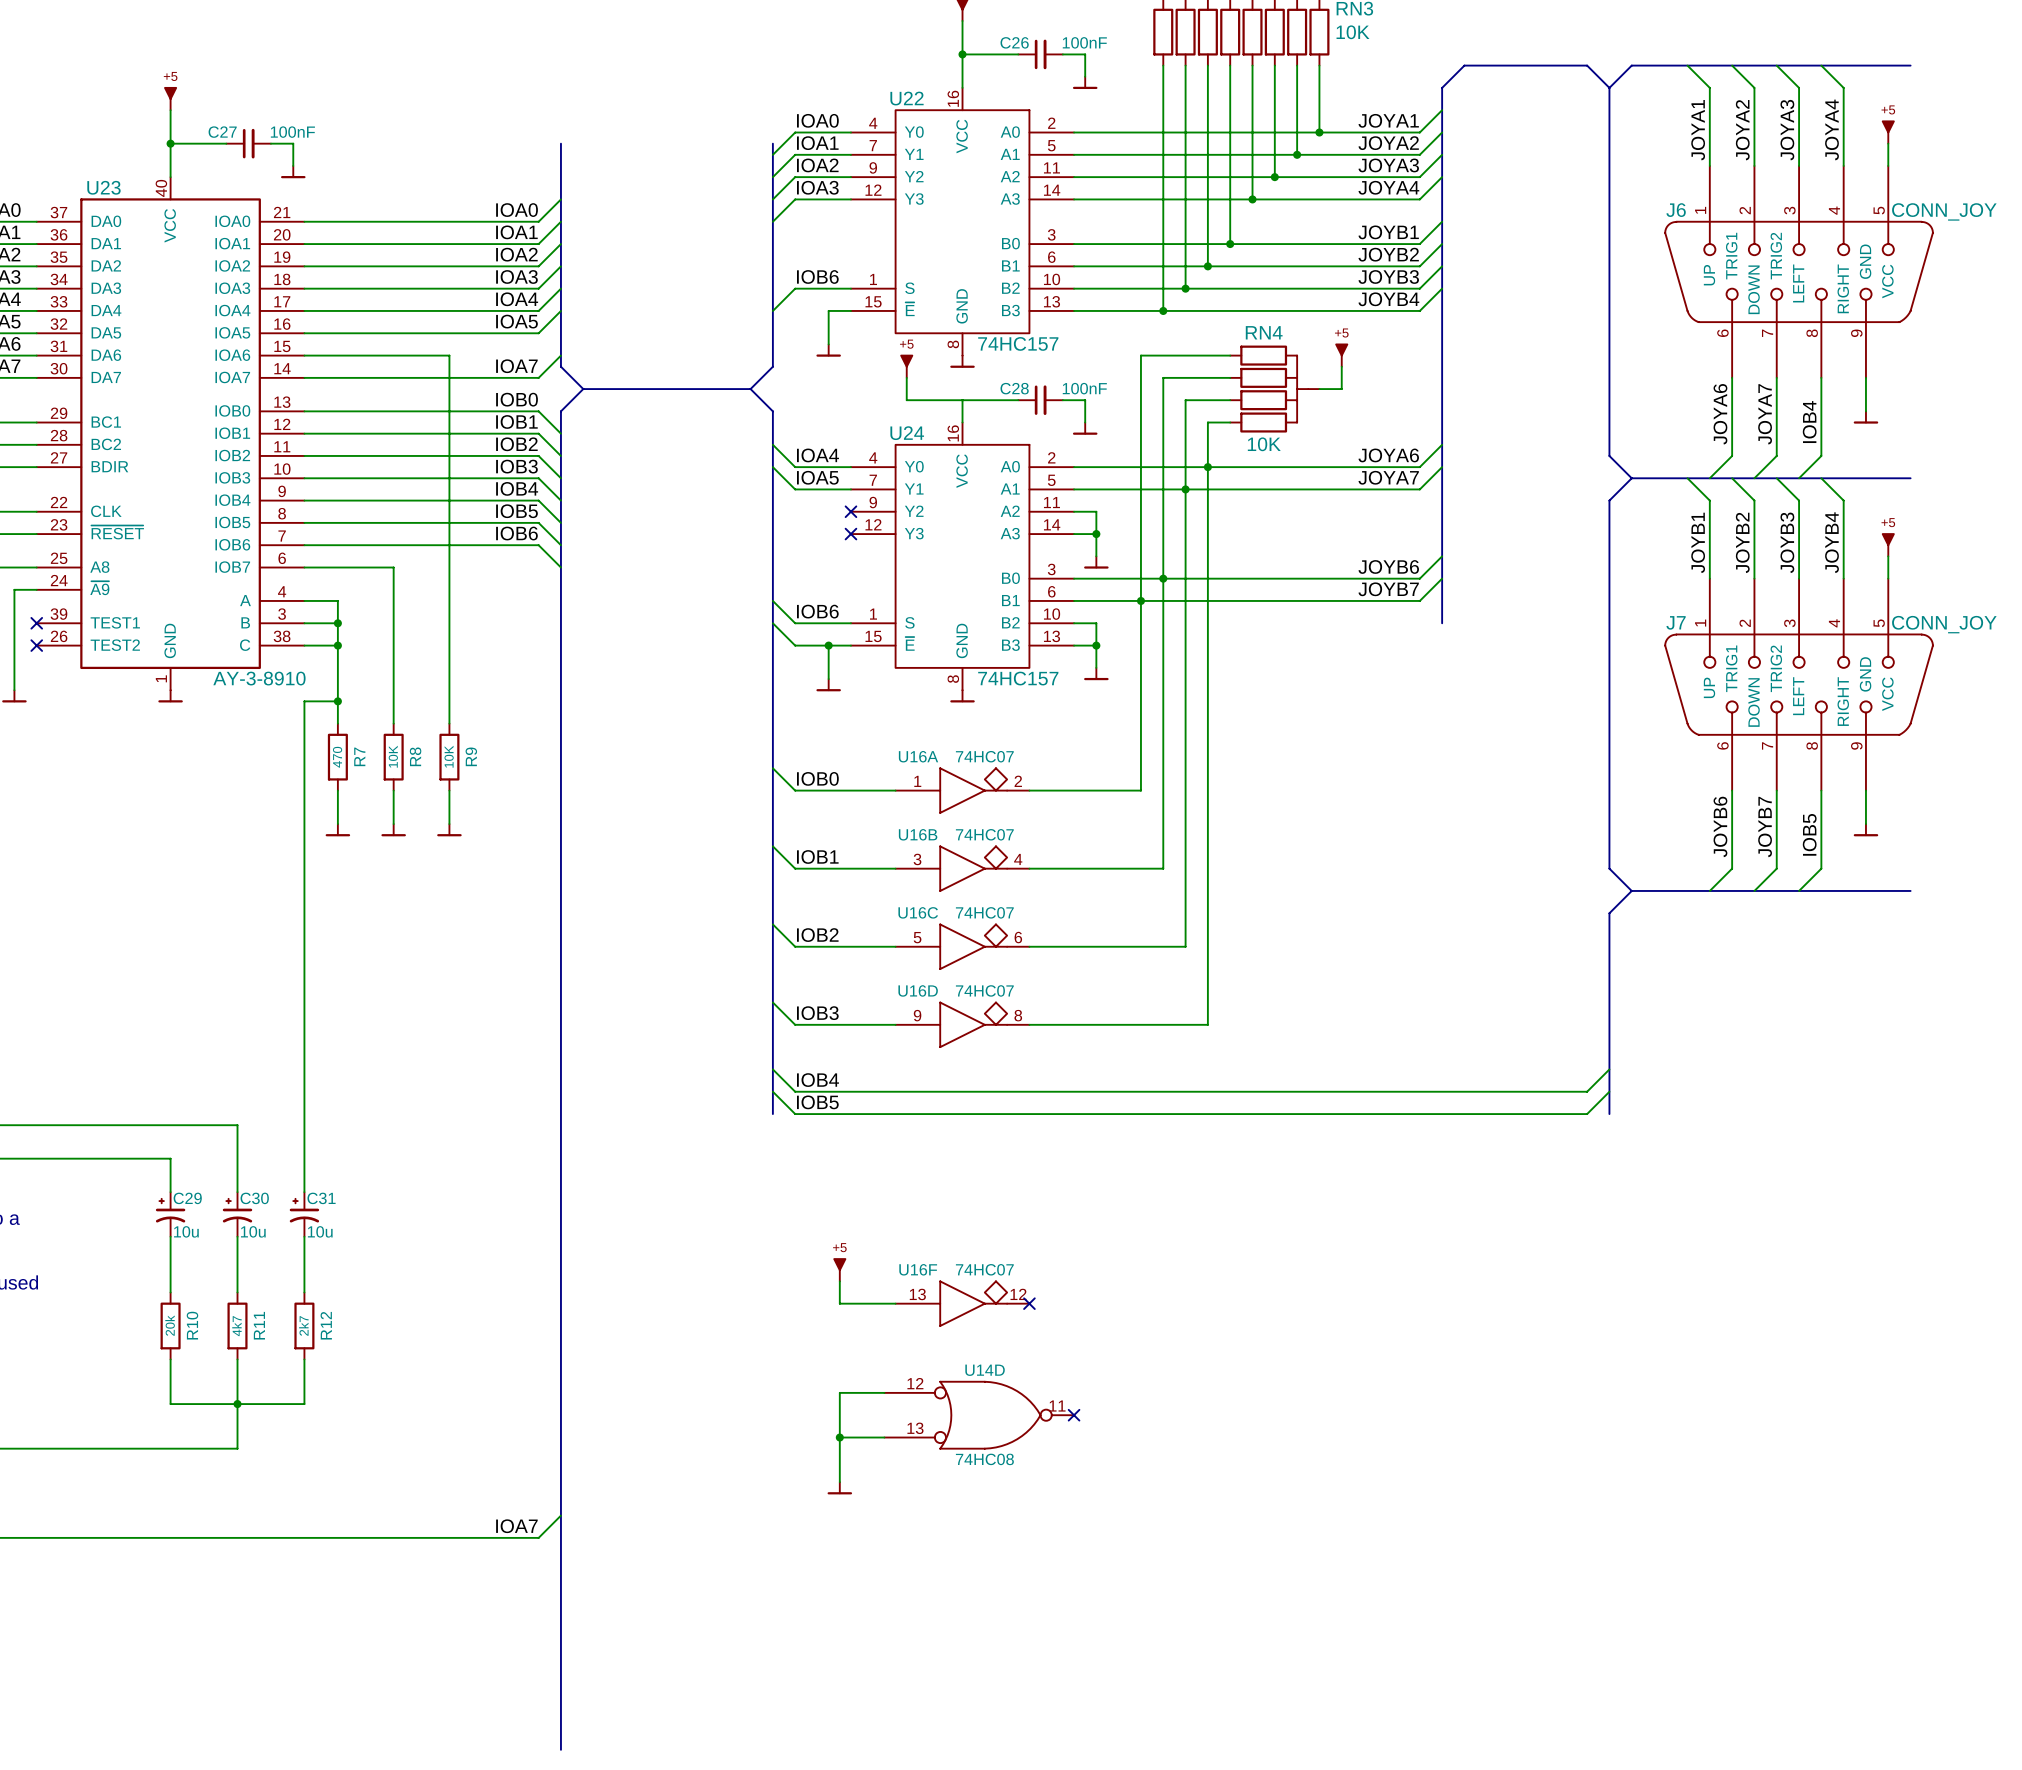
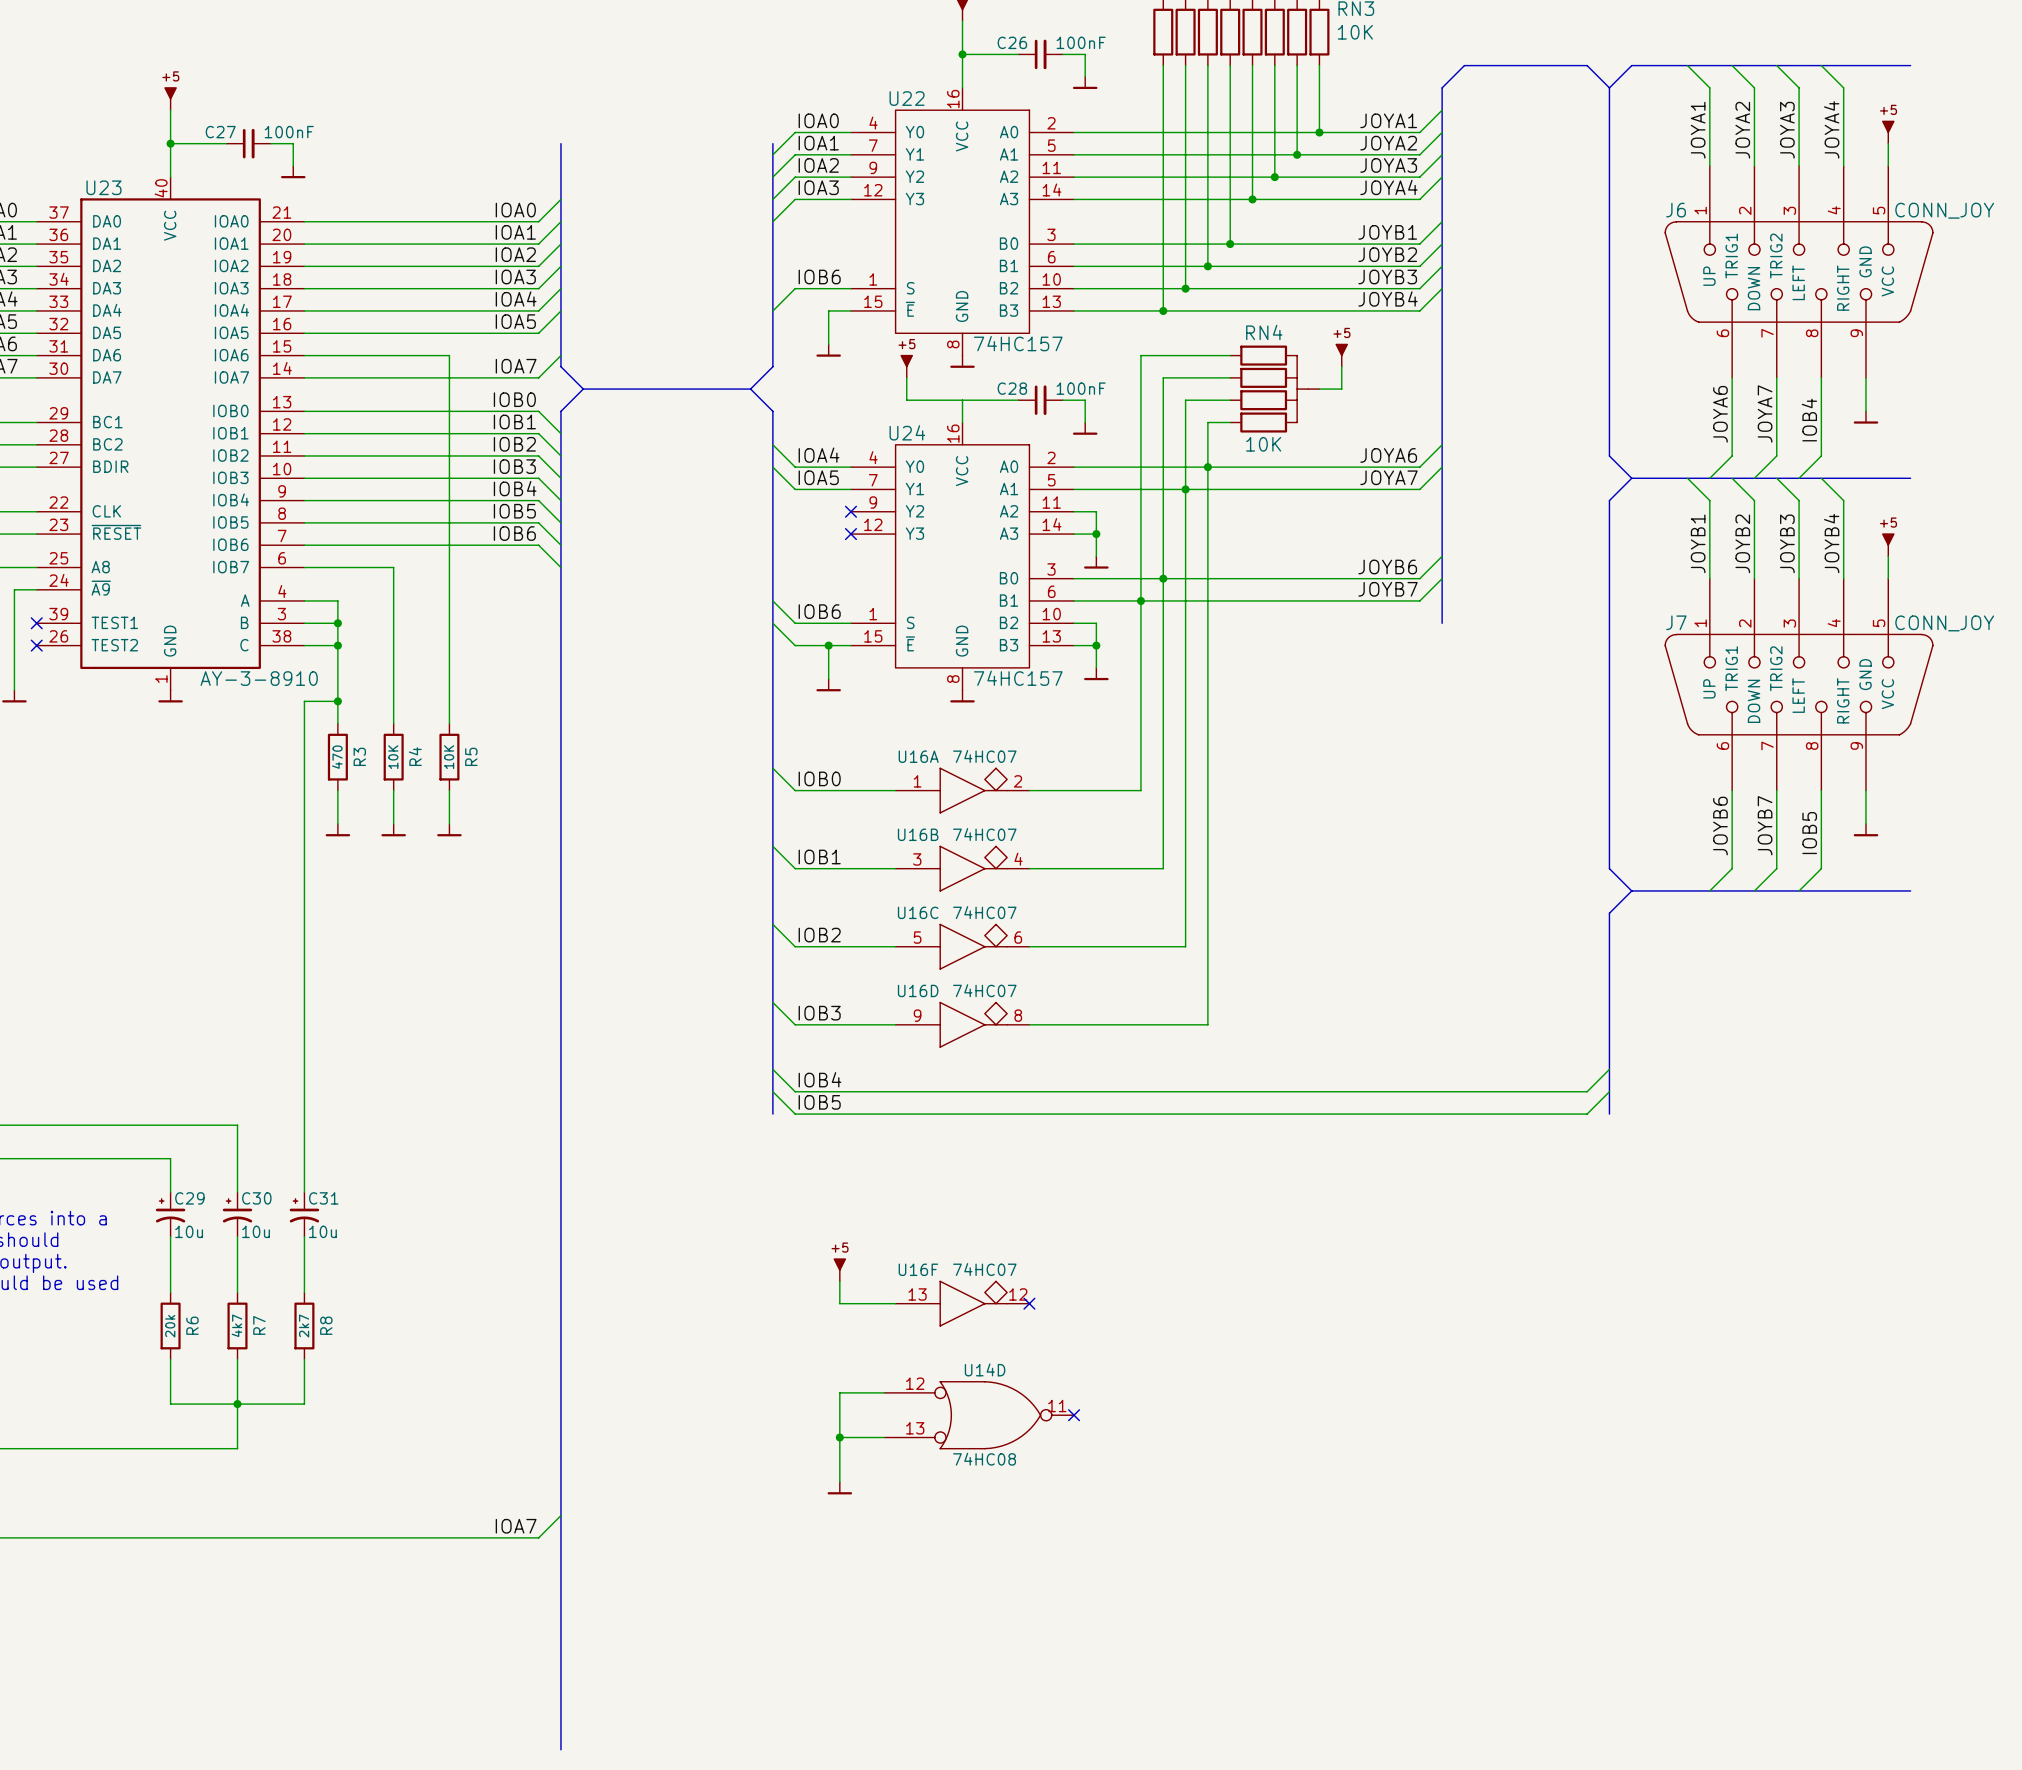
R7 name: R7 (359, 756) -> R3 (359, 756)
R8 name: R8 (415, 756) -> R4 (415, 756)
R9 name: R9 (471, 756) -> R5 (471, 756)
R10 name: R10 (192, 1325) -> R6 (192, 1325)
R11 name: R11 (259, 1325) -> R7 (259, 1325)
R12 name: R12 (326, 1325) -> R8 (326, 1325)

